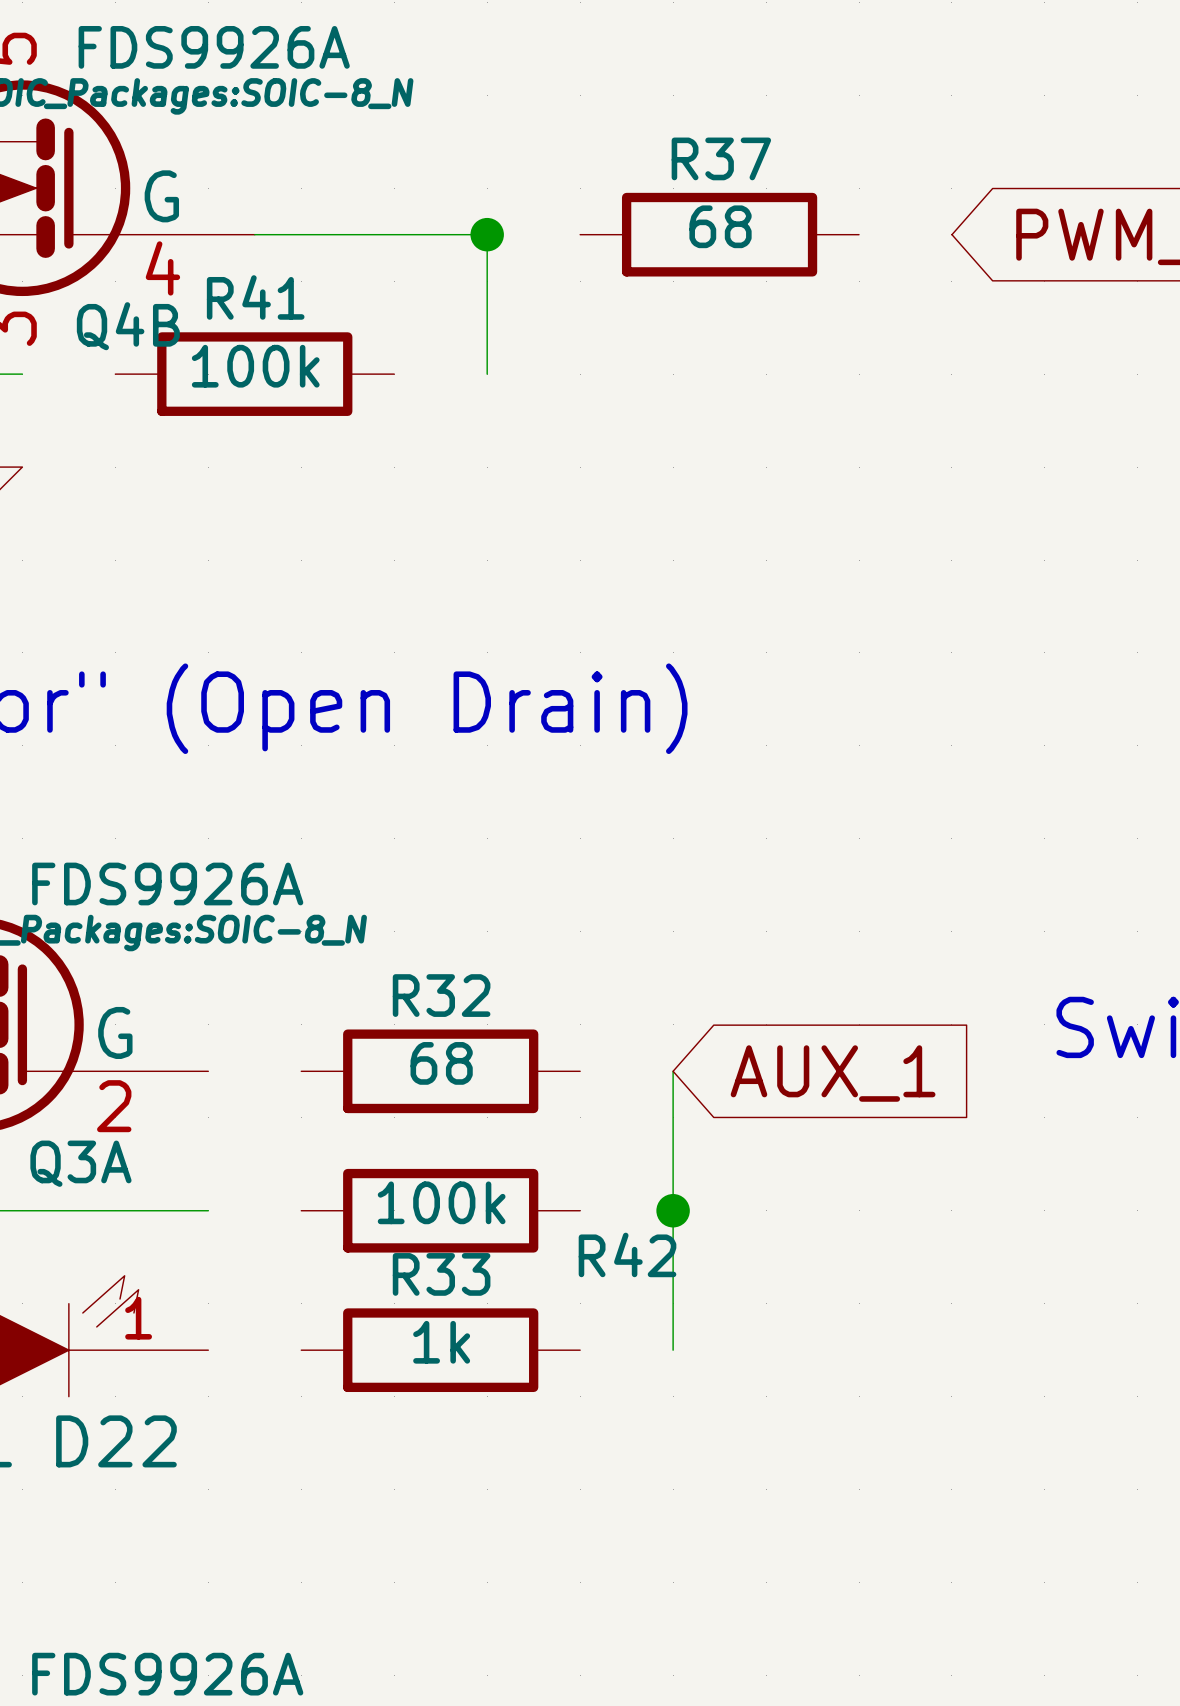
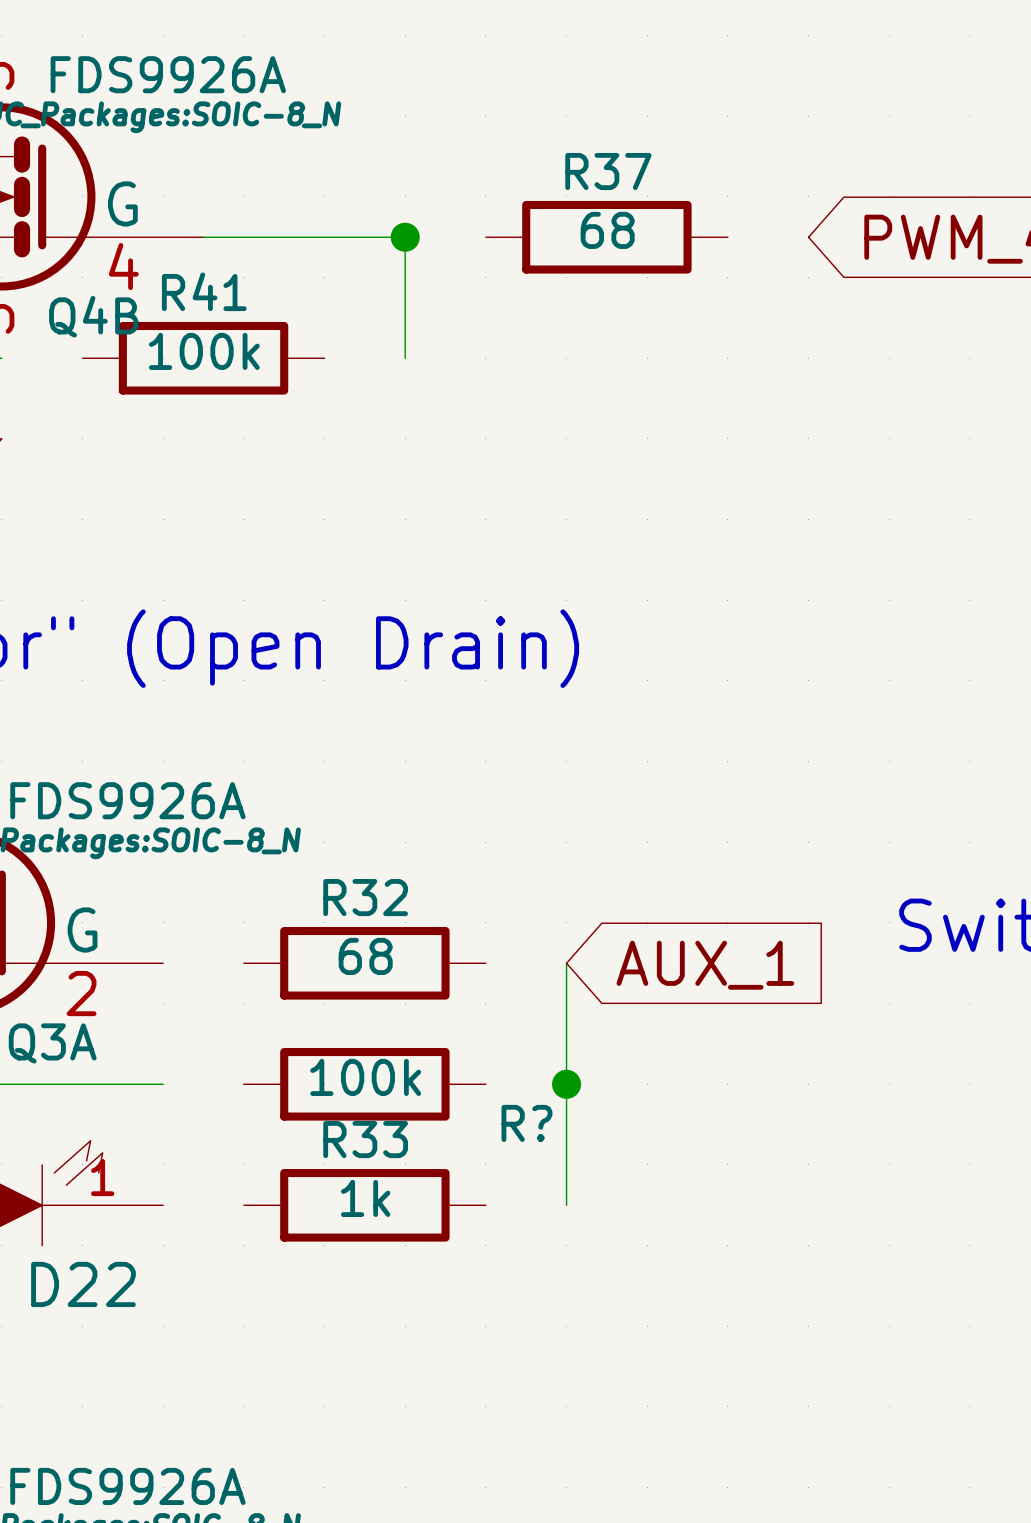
R42 name: R42 (627, 1254) -> R? (526, 1123)

